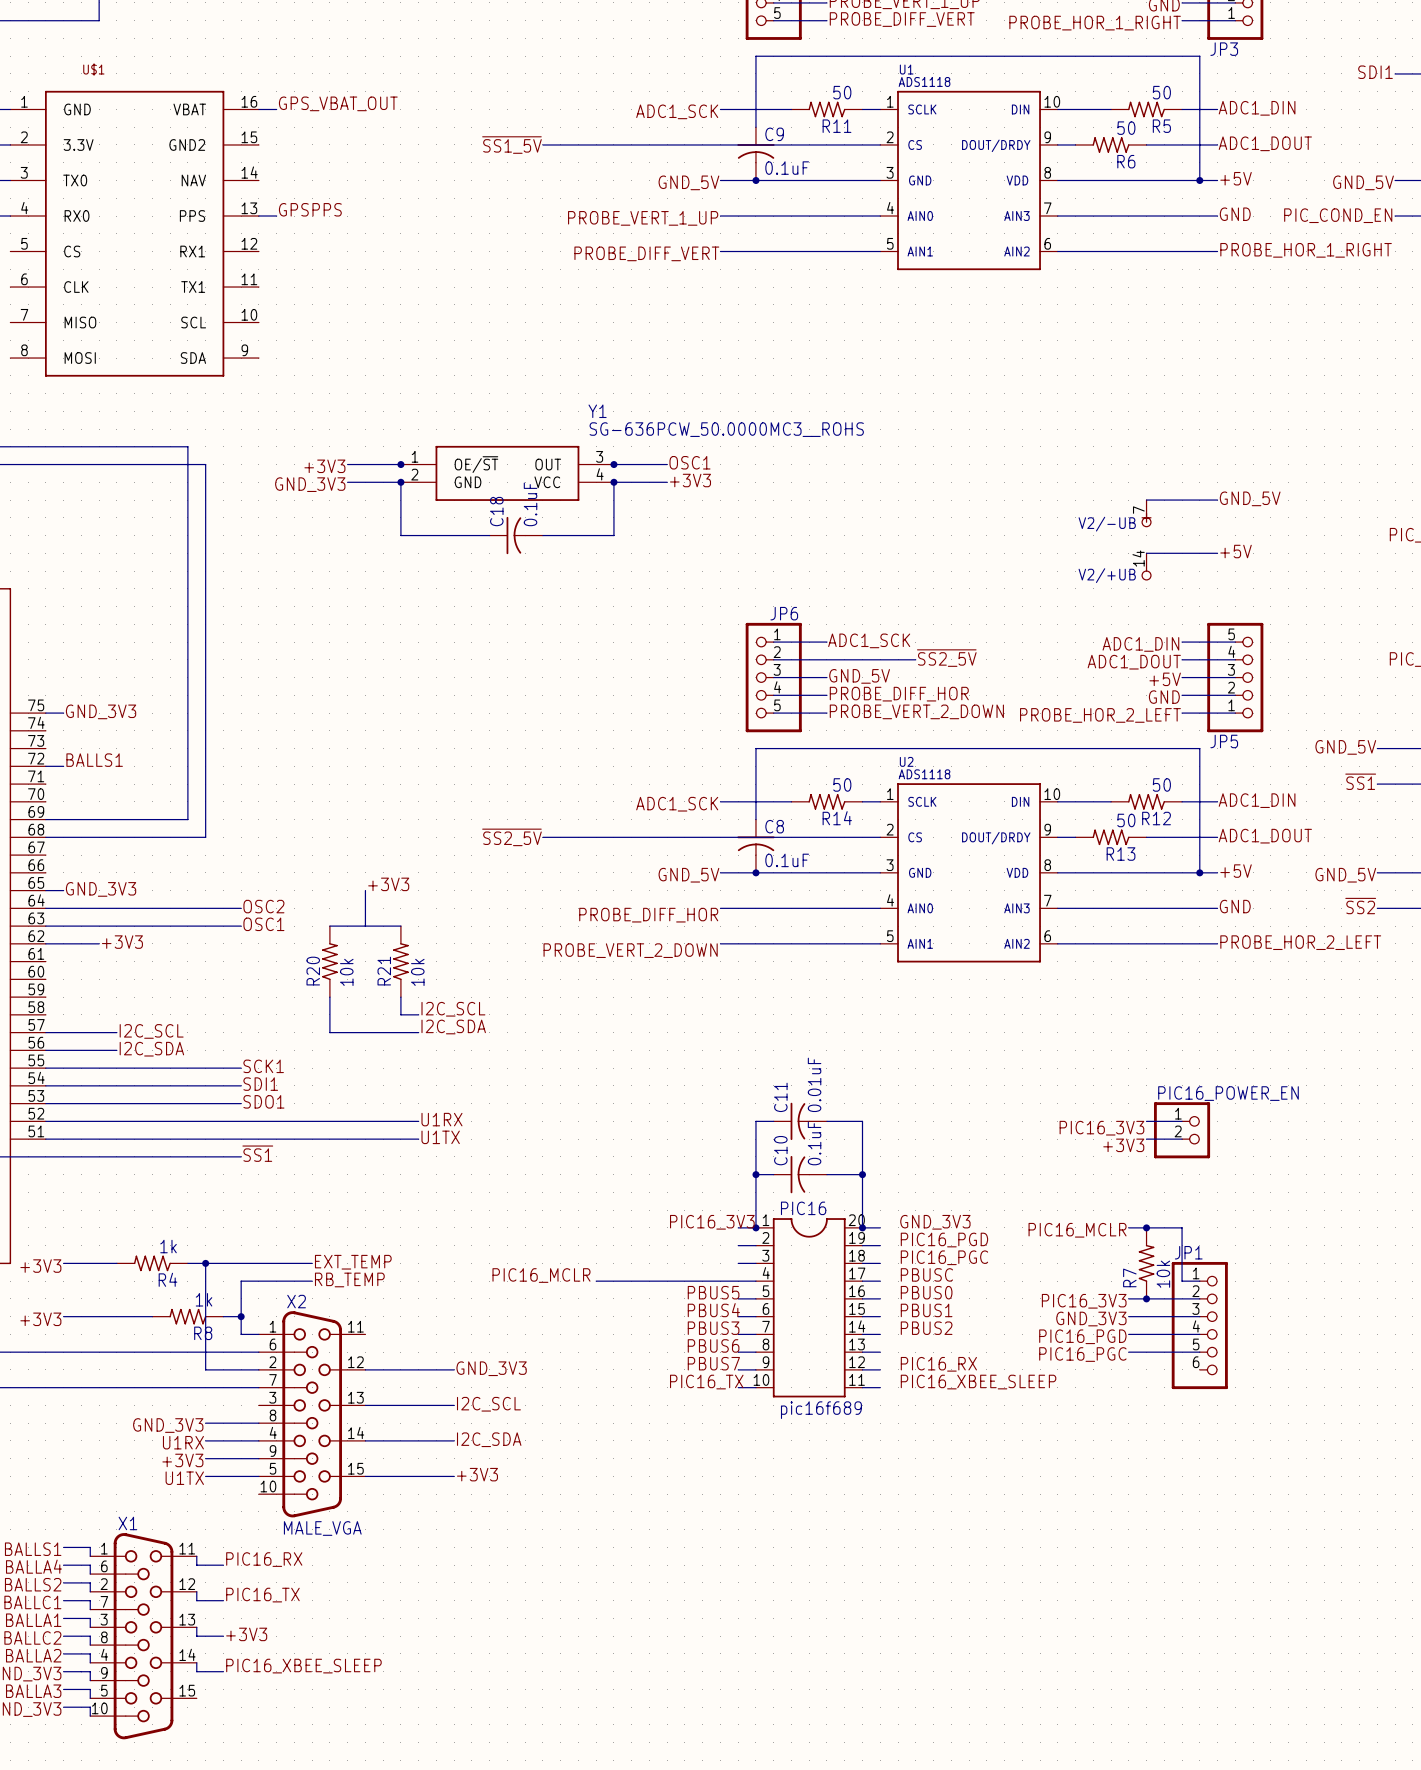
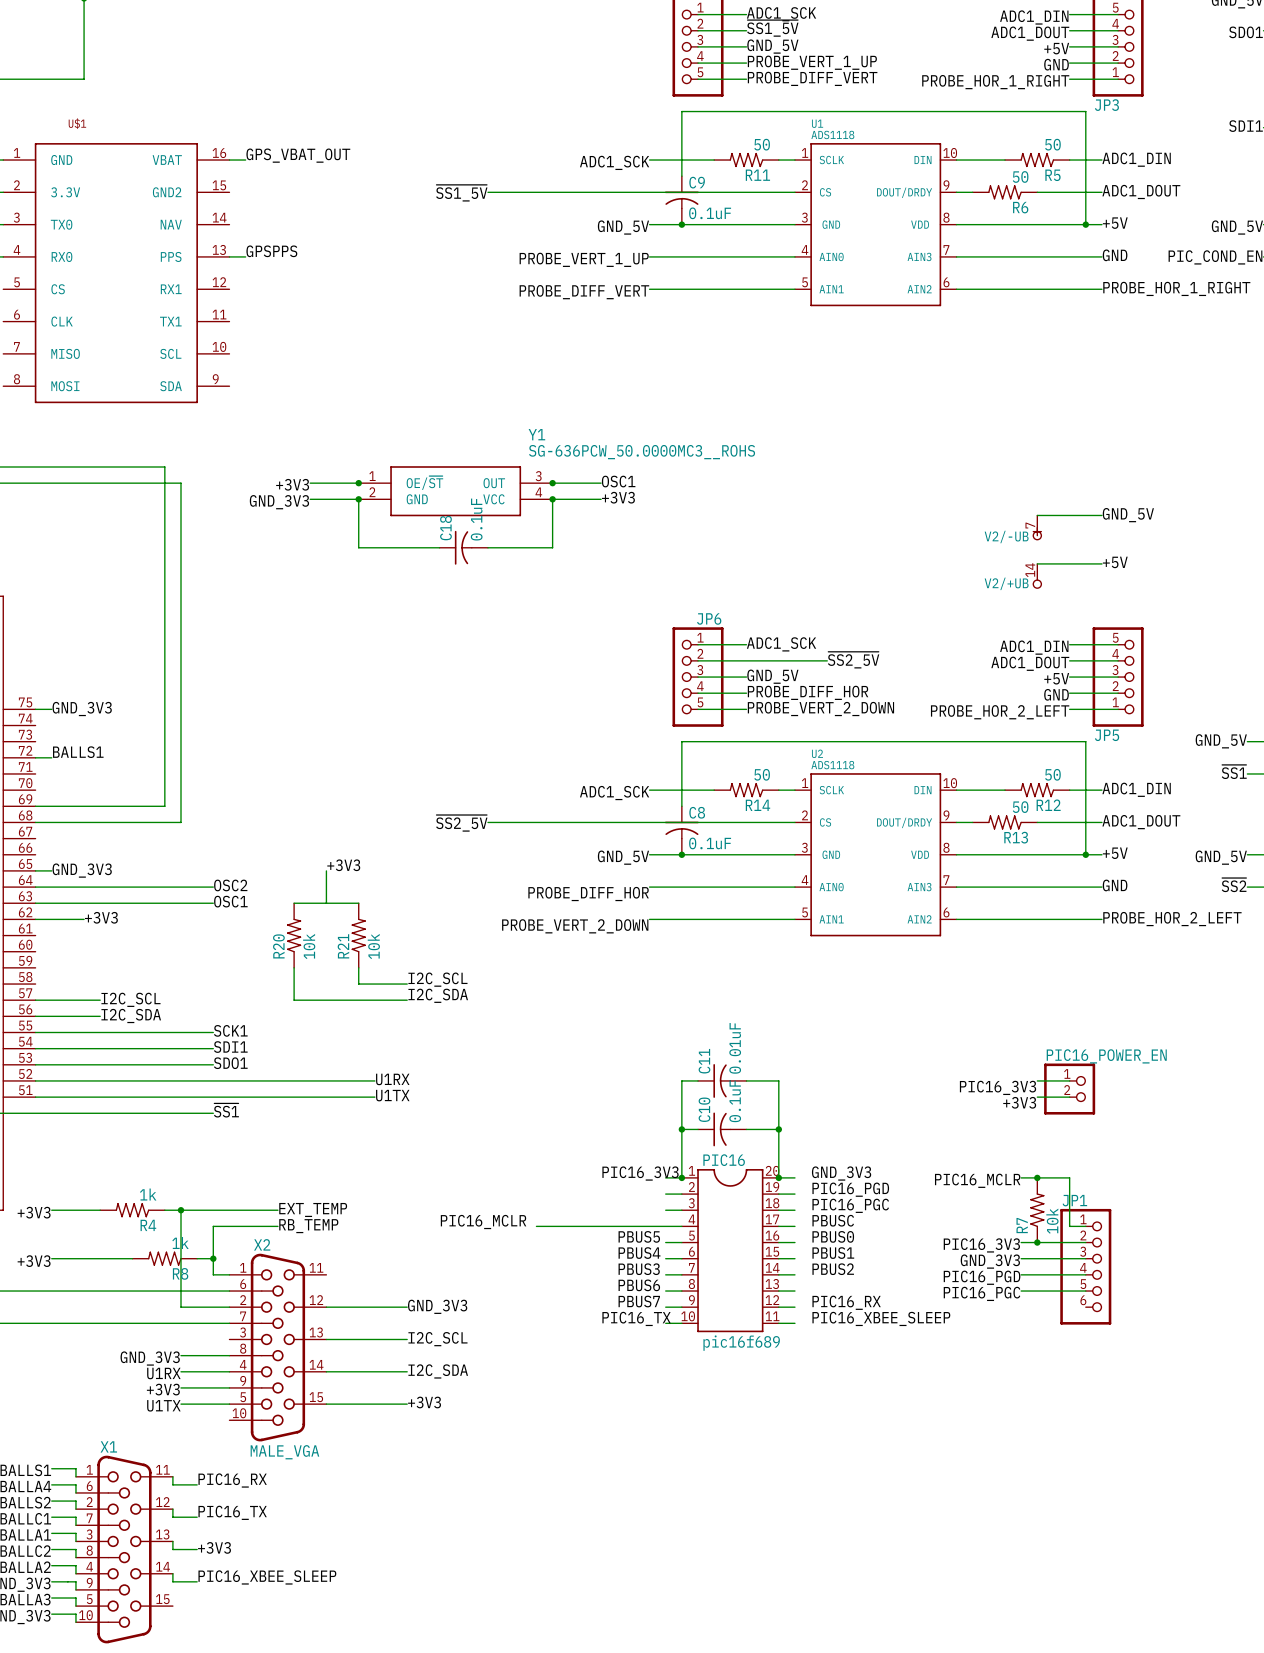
label position: I2C_SCL (453, 1009) -> I2C_SCL (437, 979)
wire: none -> (374, 984) (407, 984)
label position: I2C_SDA (453, 1026) -> I2C_SDA (438, 995)
wire: none -> (374, 1000) (407, 1000)

